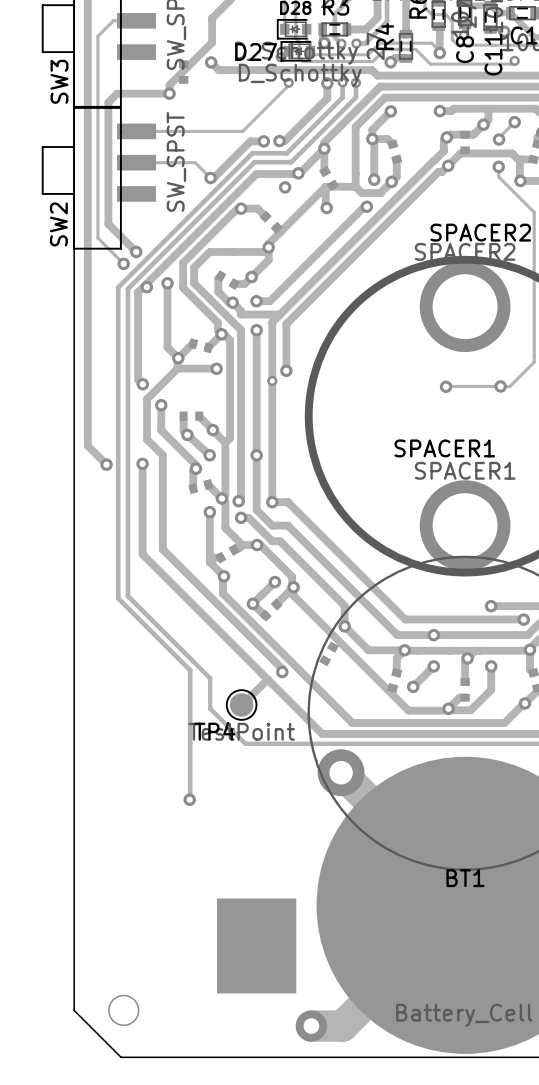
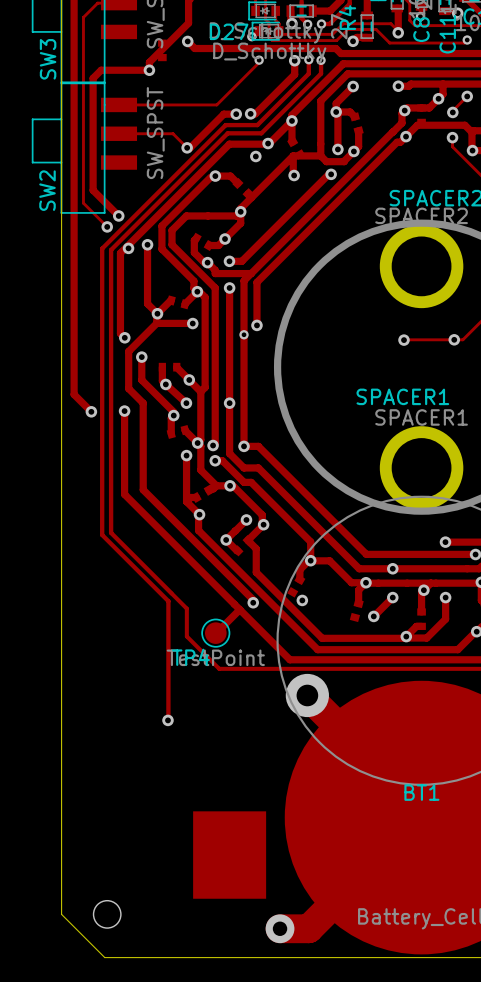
track: (293, 587) (293, 595) (408, 710) -> (248, 540) (256, 548) (256, 572) (322, 638) (369, 638)
track: (344, 626) (368, 650) (389, 650) -> (310, 560) (329, 560) (351, 582)
track: none -> (310, 560) (299, 569) (299, 579)
via: none -> (302, 600)

